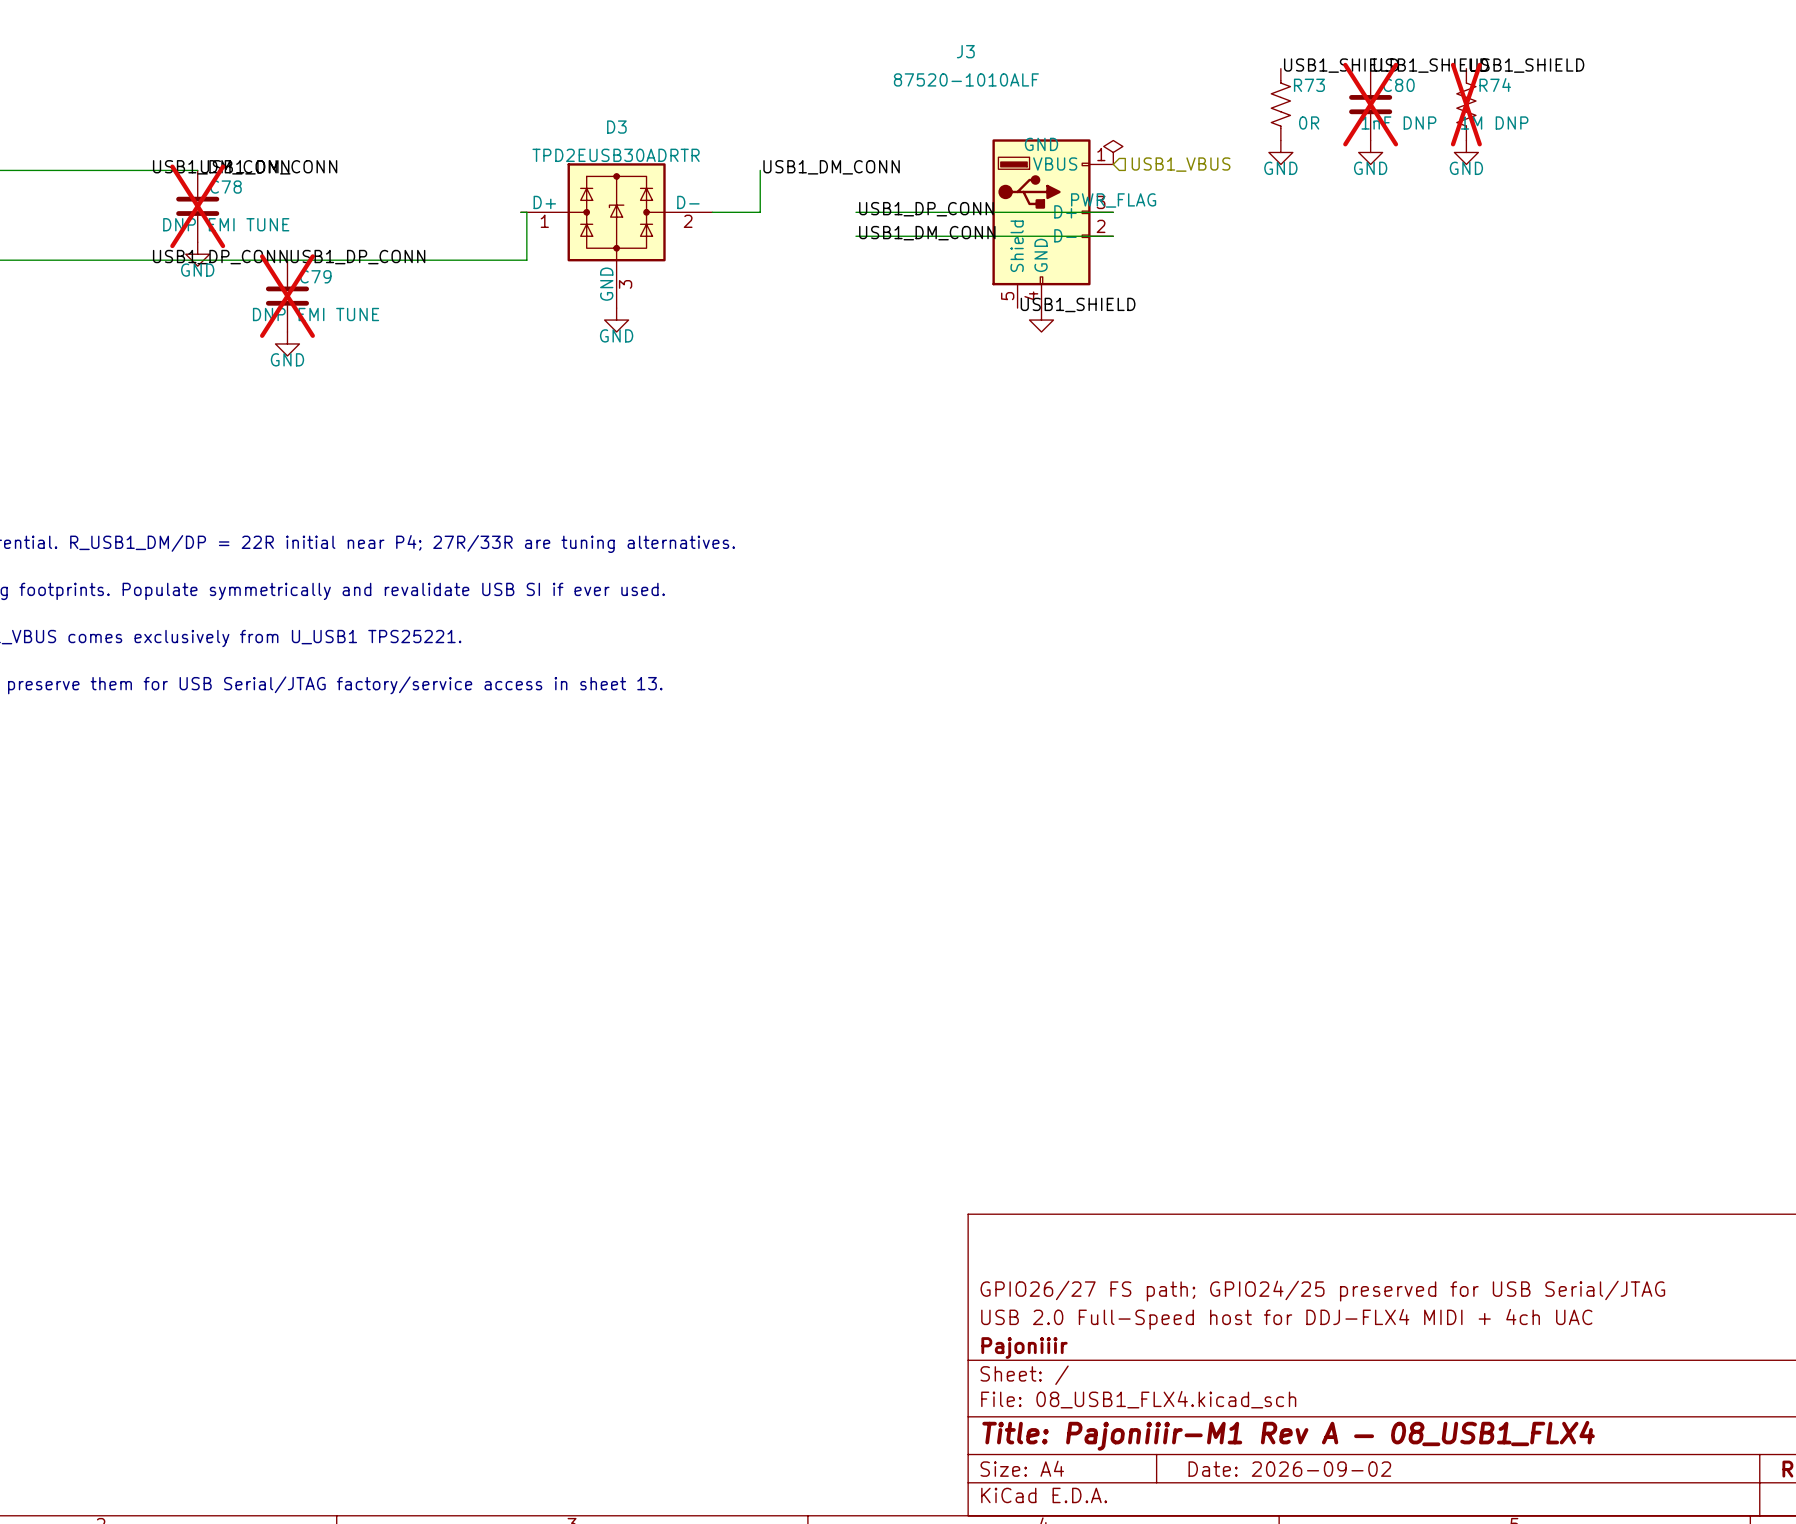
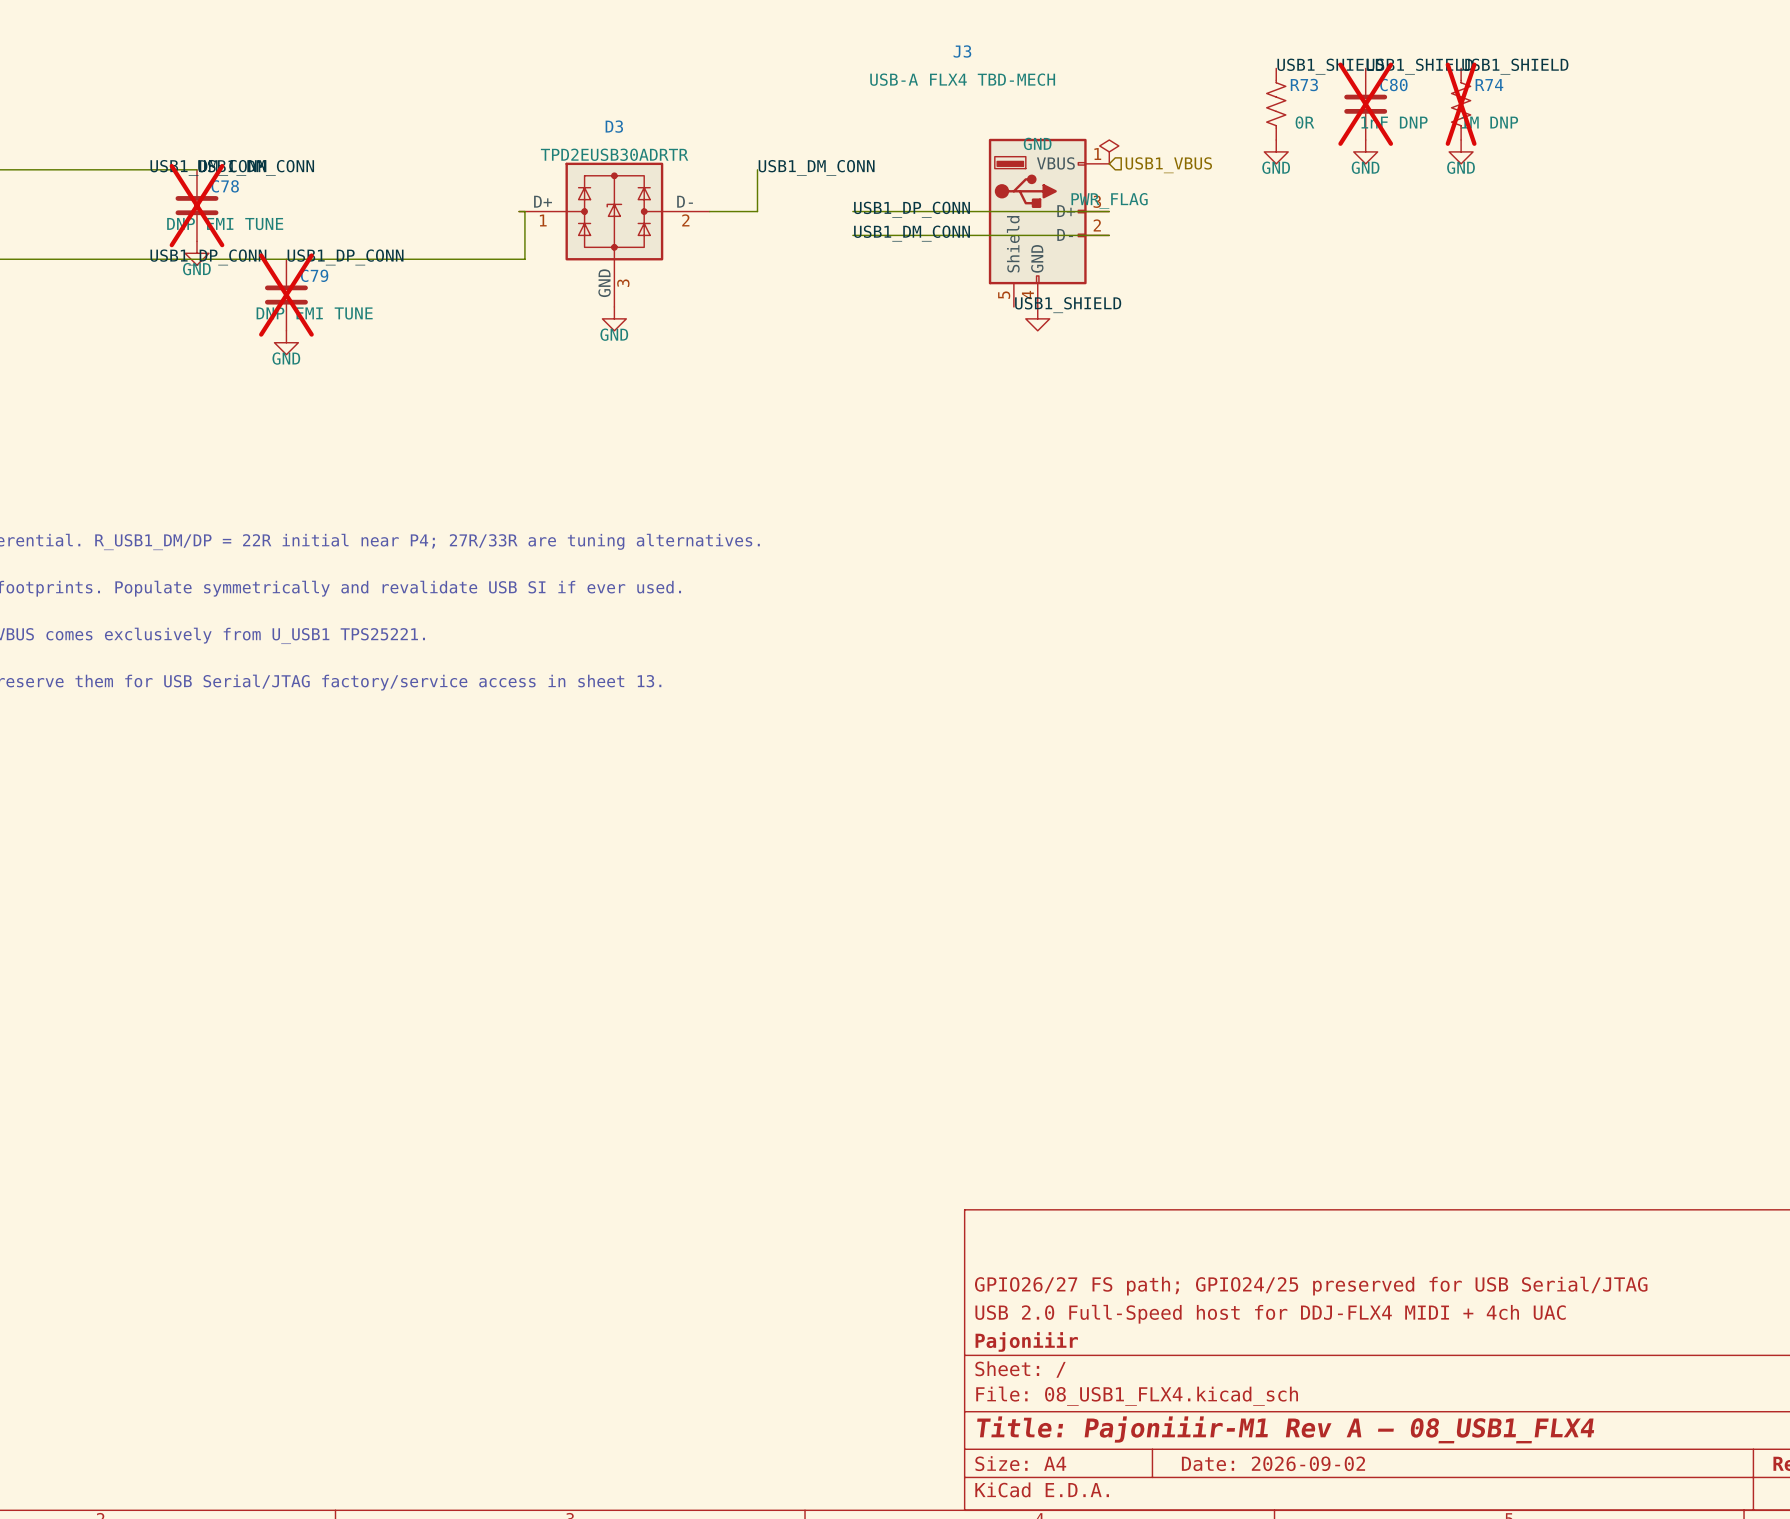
J3 value: 87520-1010ALF (966, 79) -> USB-A FLX4 TBD-MECH (962, 79)

